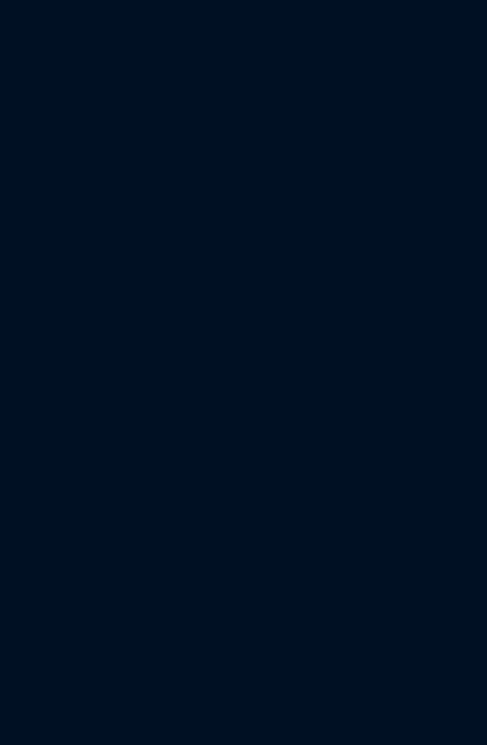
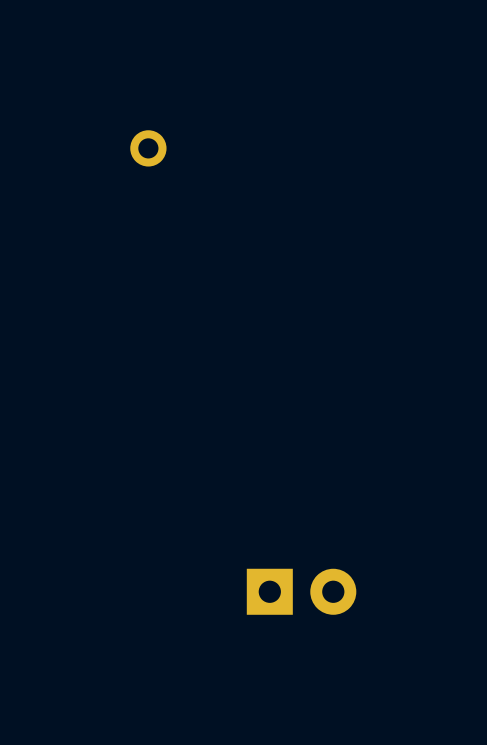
part: none -> (148, 148)
part: none -> (301, 591)

